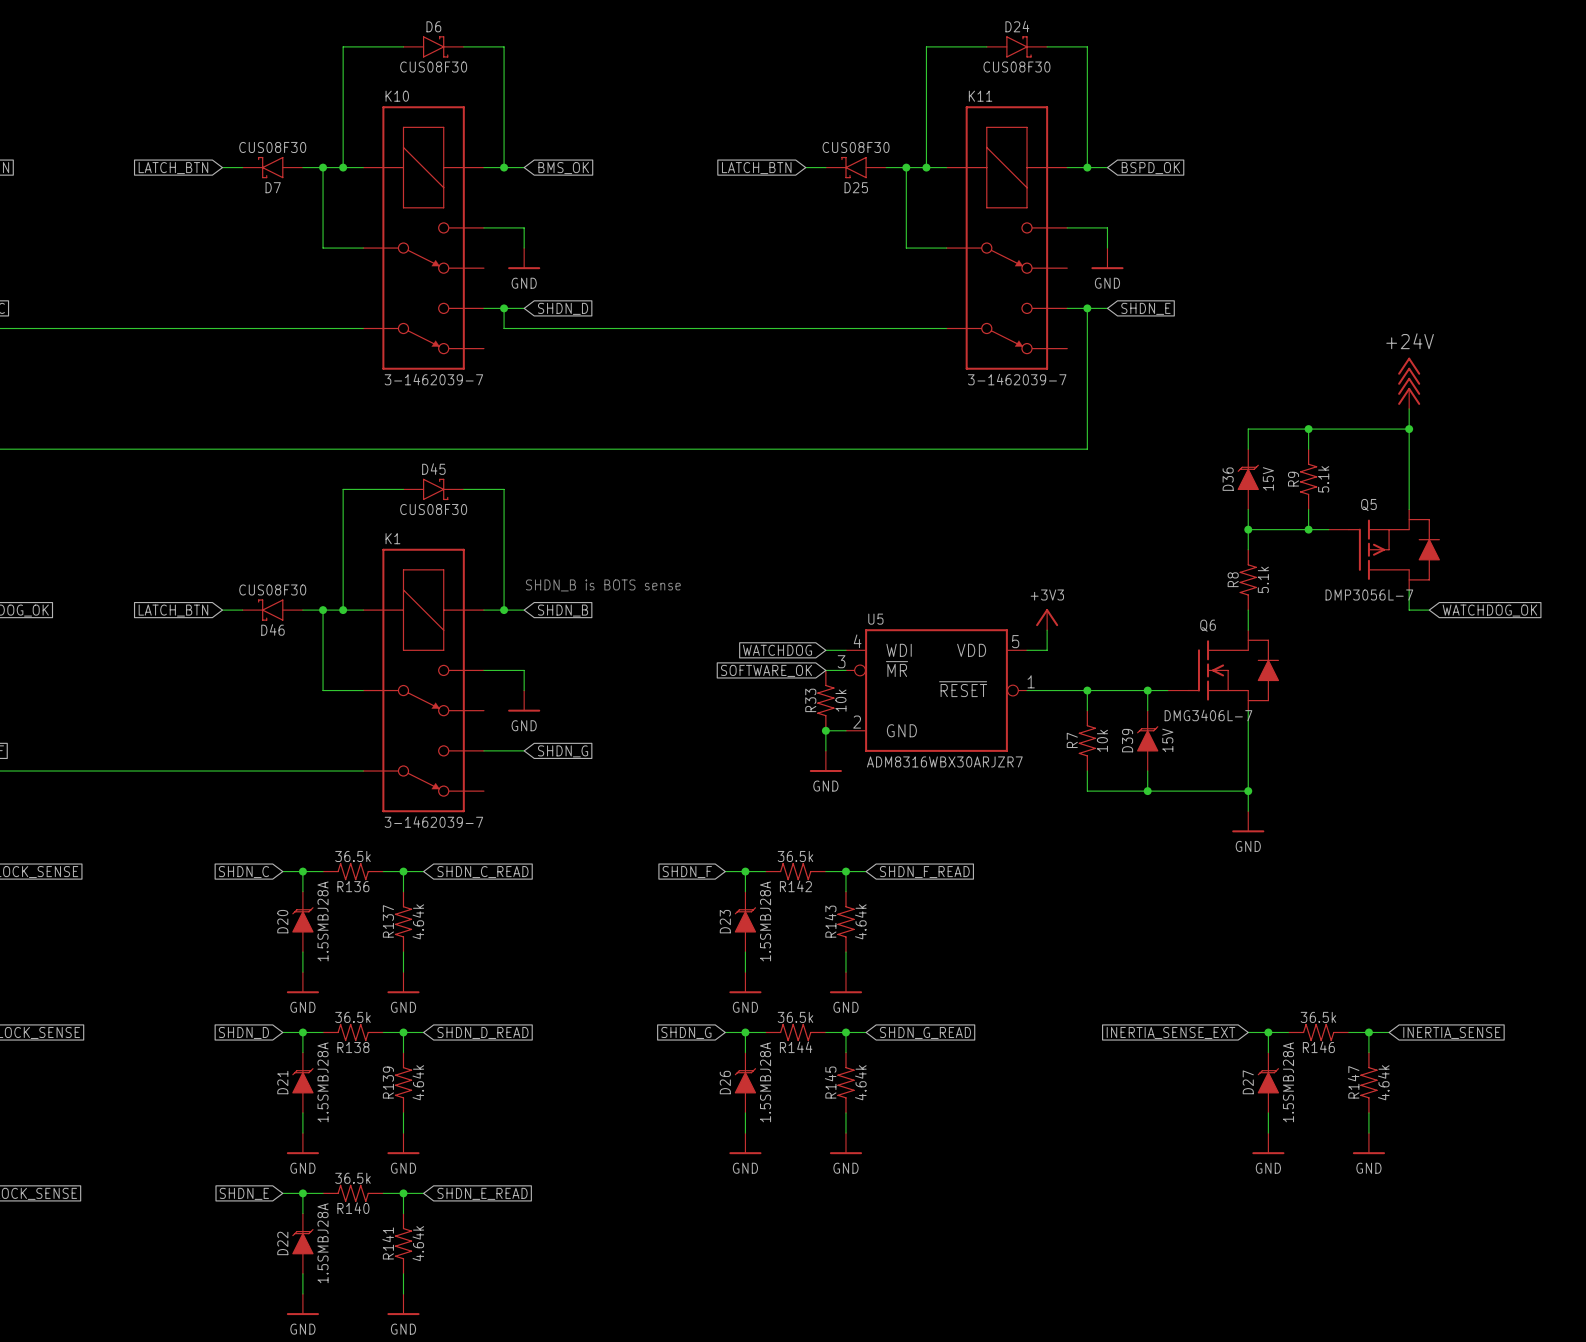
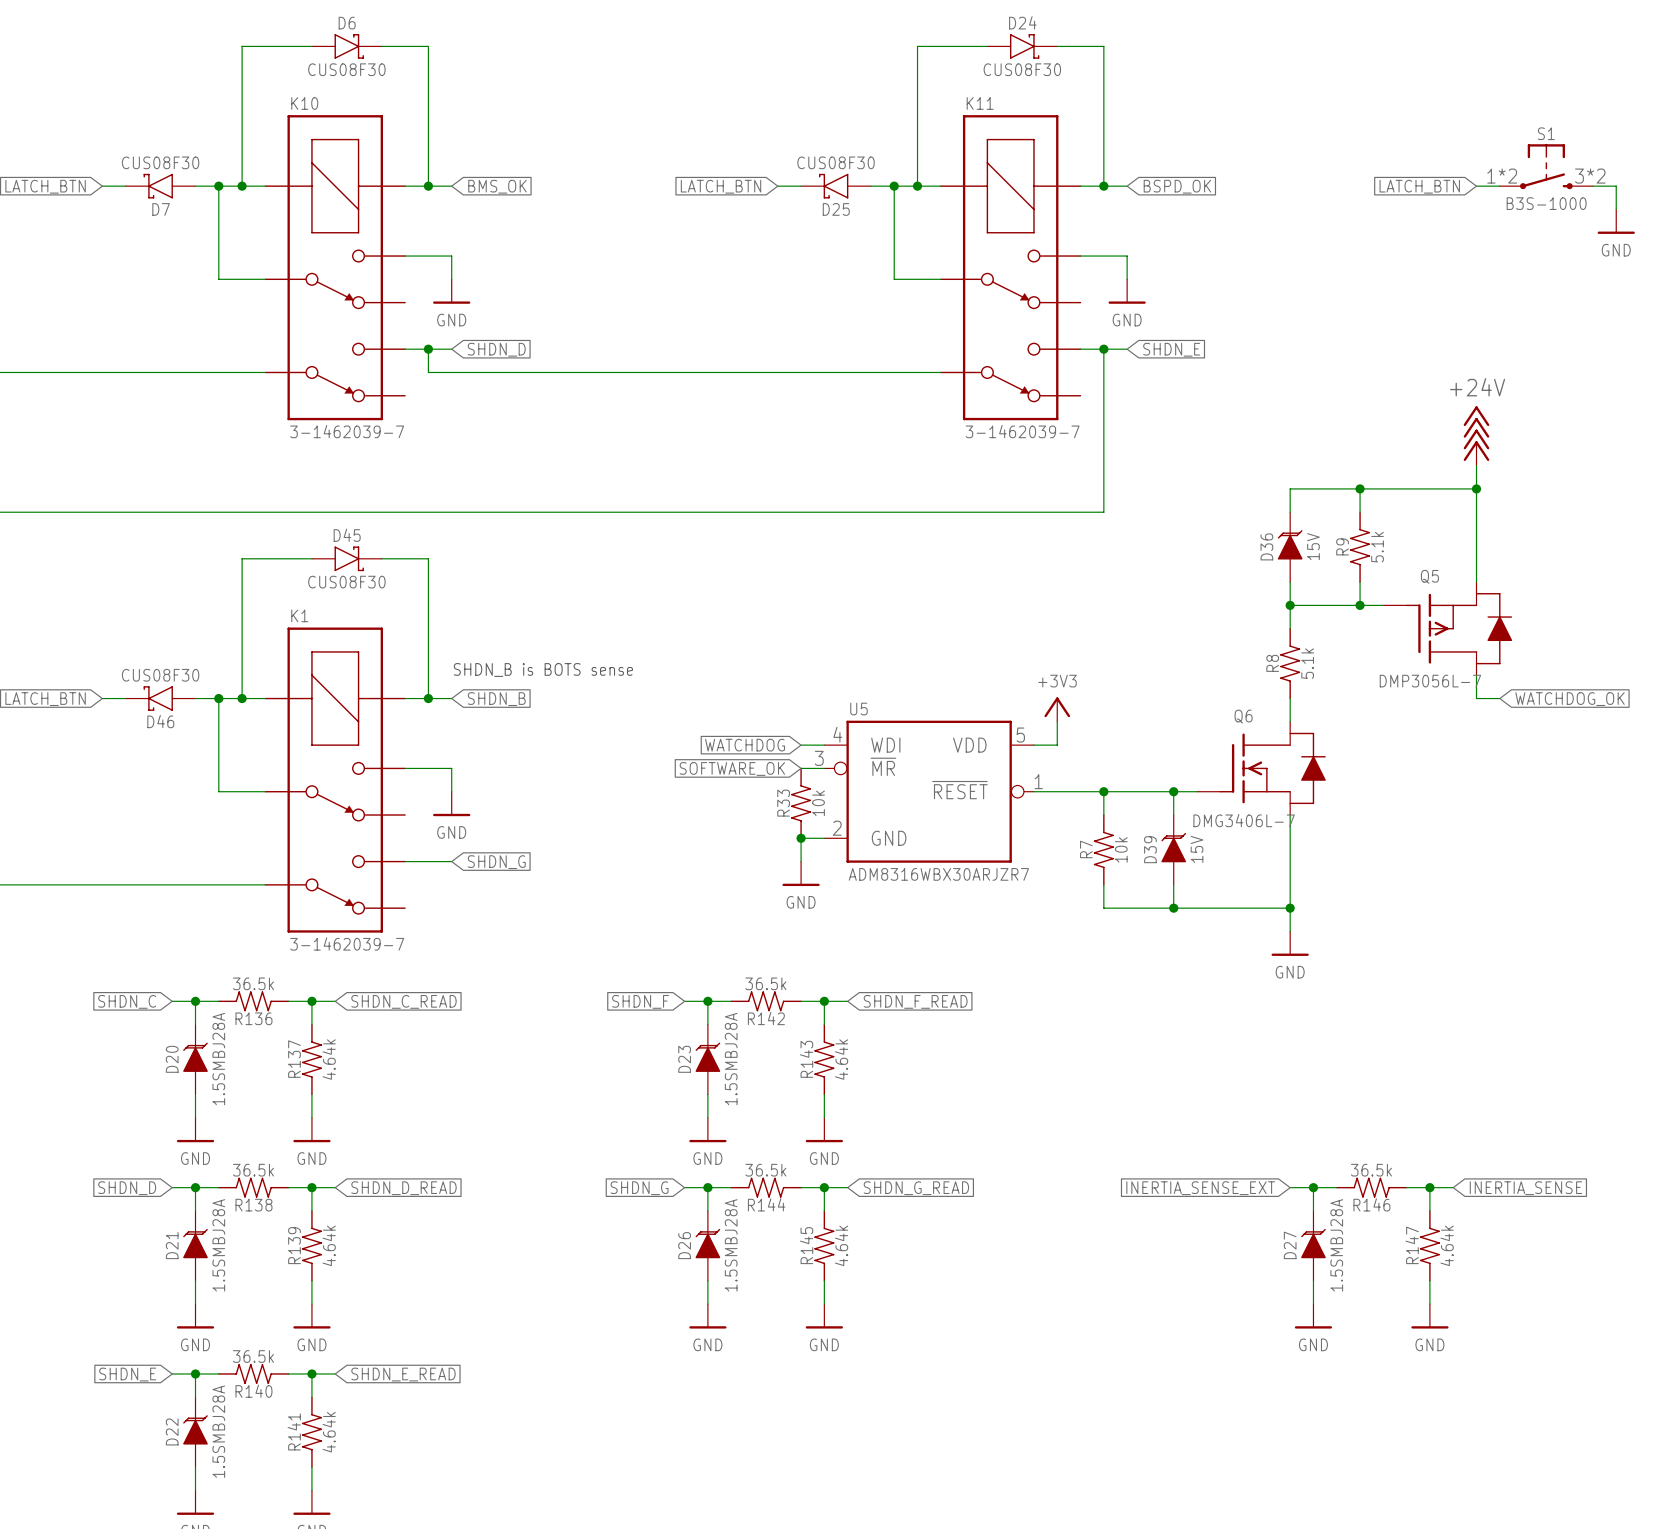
S1: none -> (1546, 166)
wire: none -> (1476, 186) (1499, 186)
wire: none -> (1592, 186) (1616, 186) (1616, 209)
global label: none -> LATCH_BTN (1419, 186)
power symbol: none -> GND (1616, 221)

